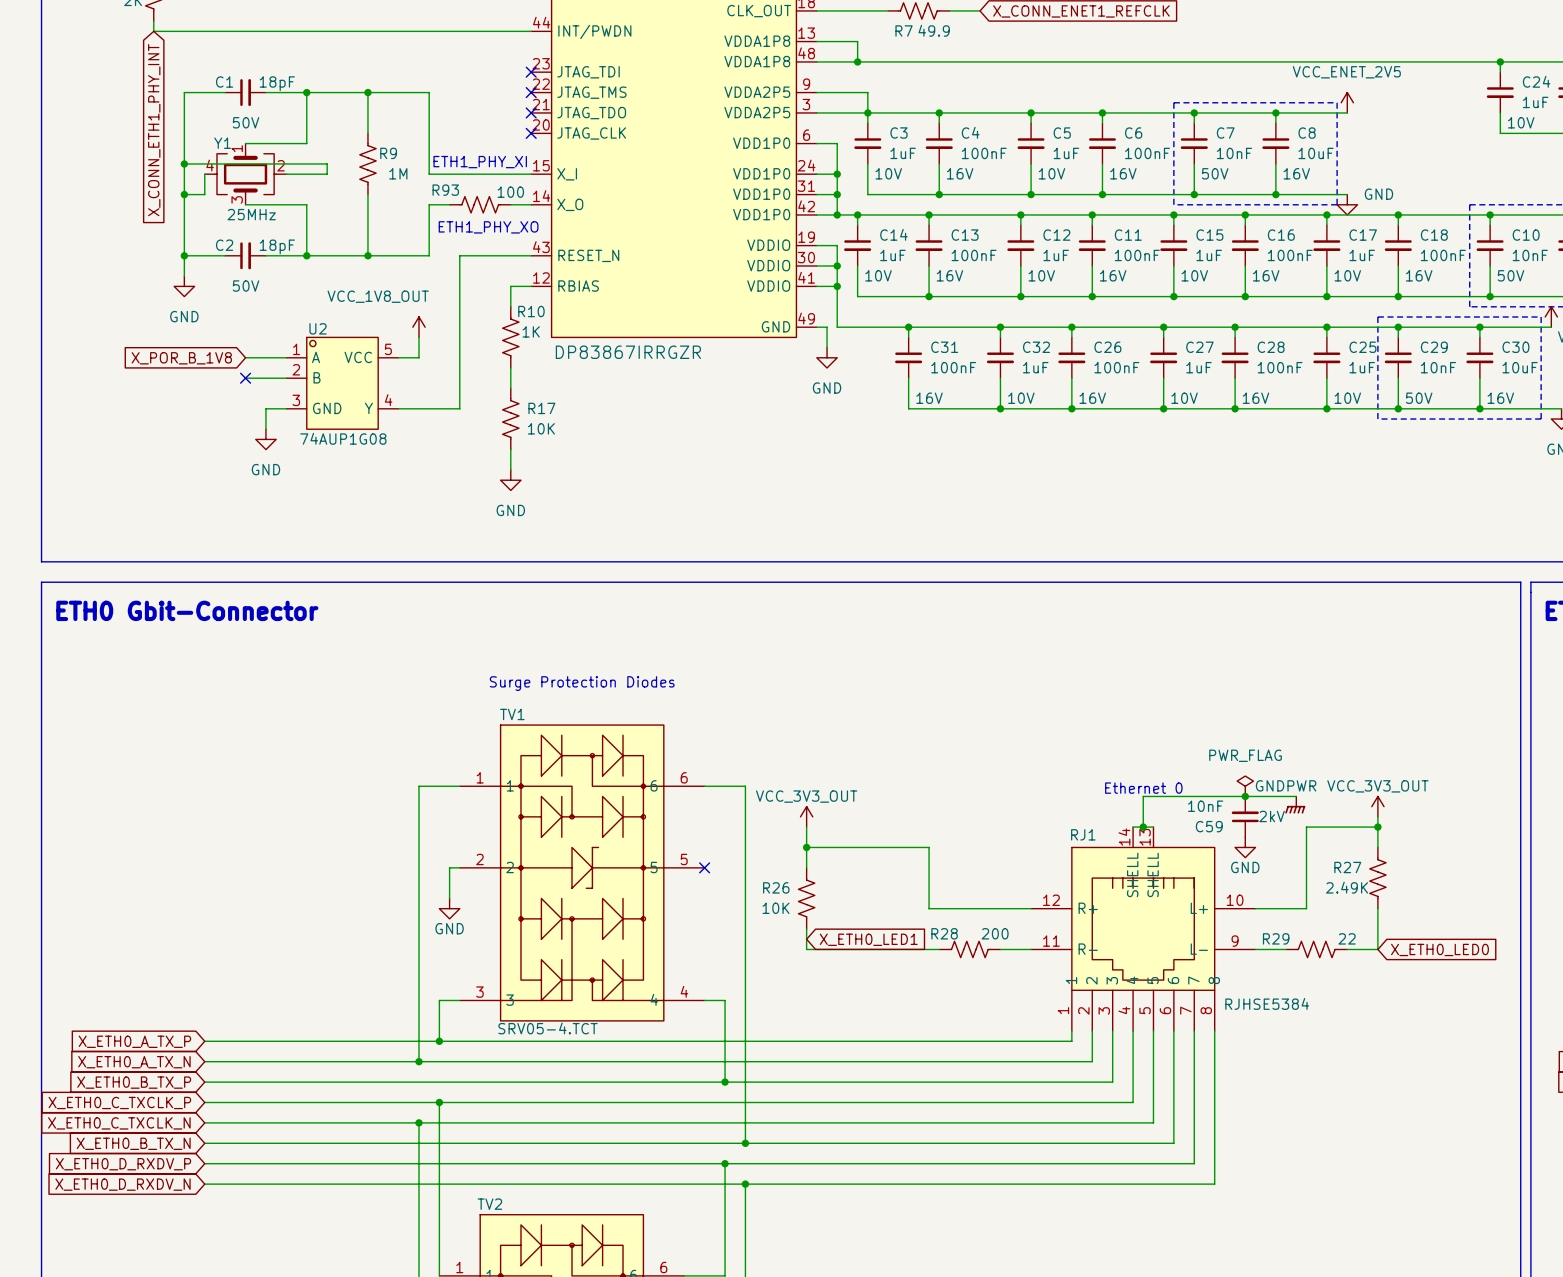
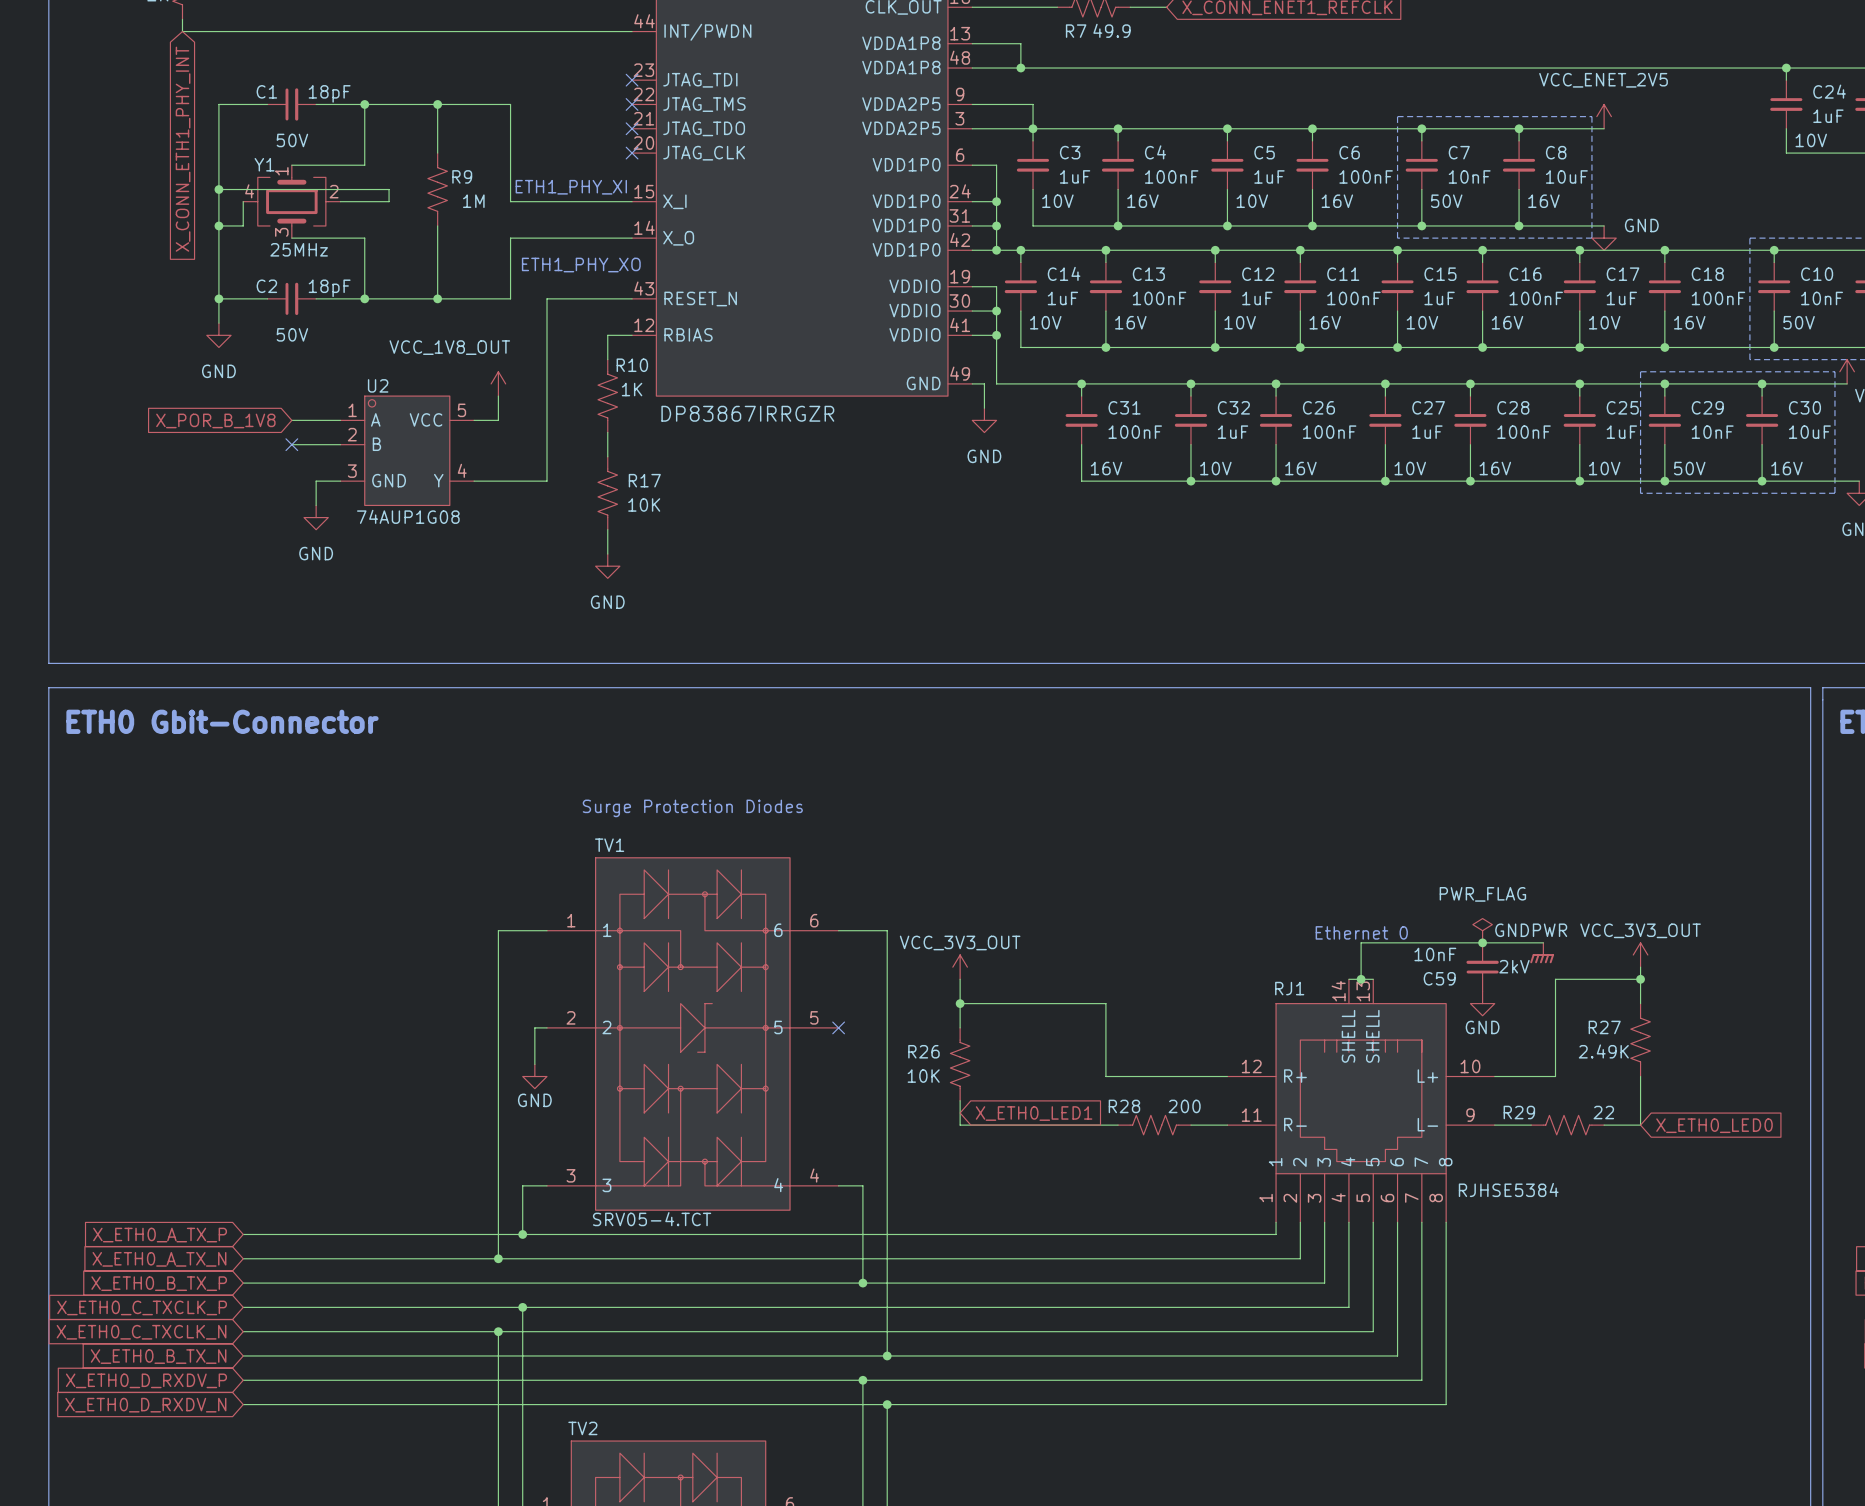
R93: 100 (480, 204) -> none

